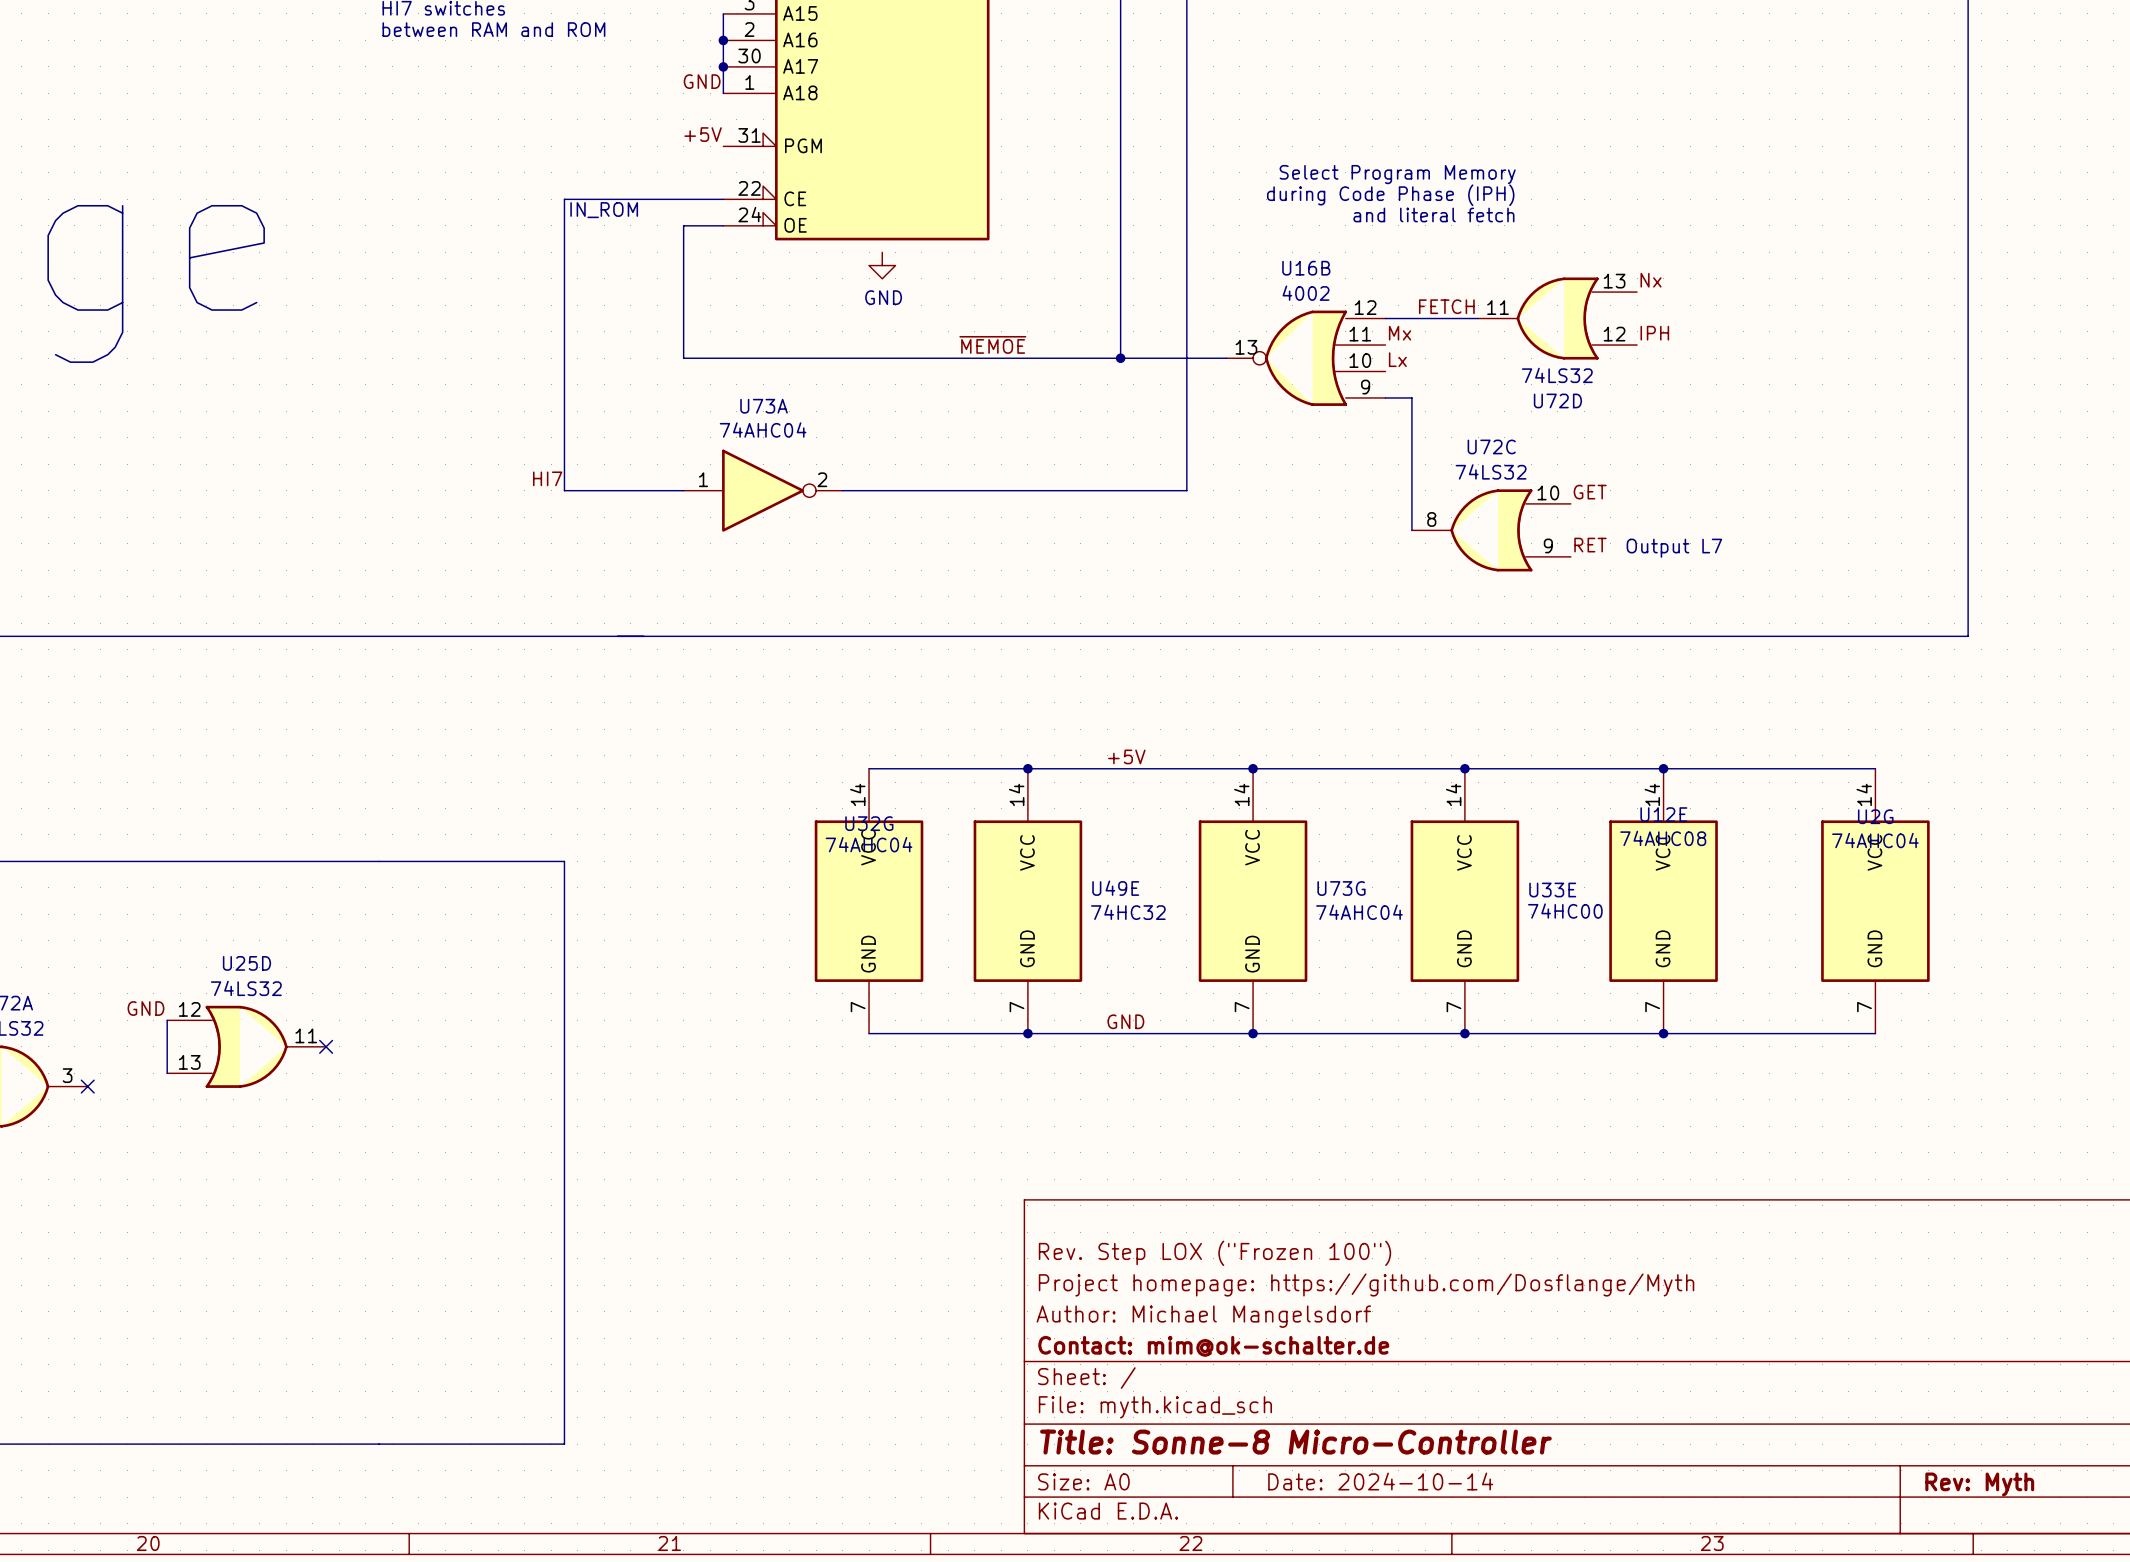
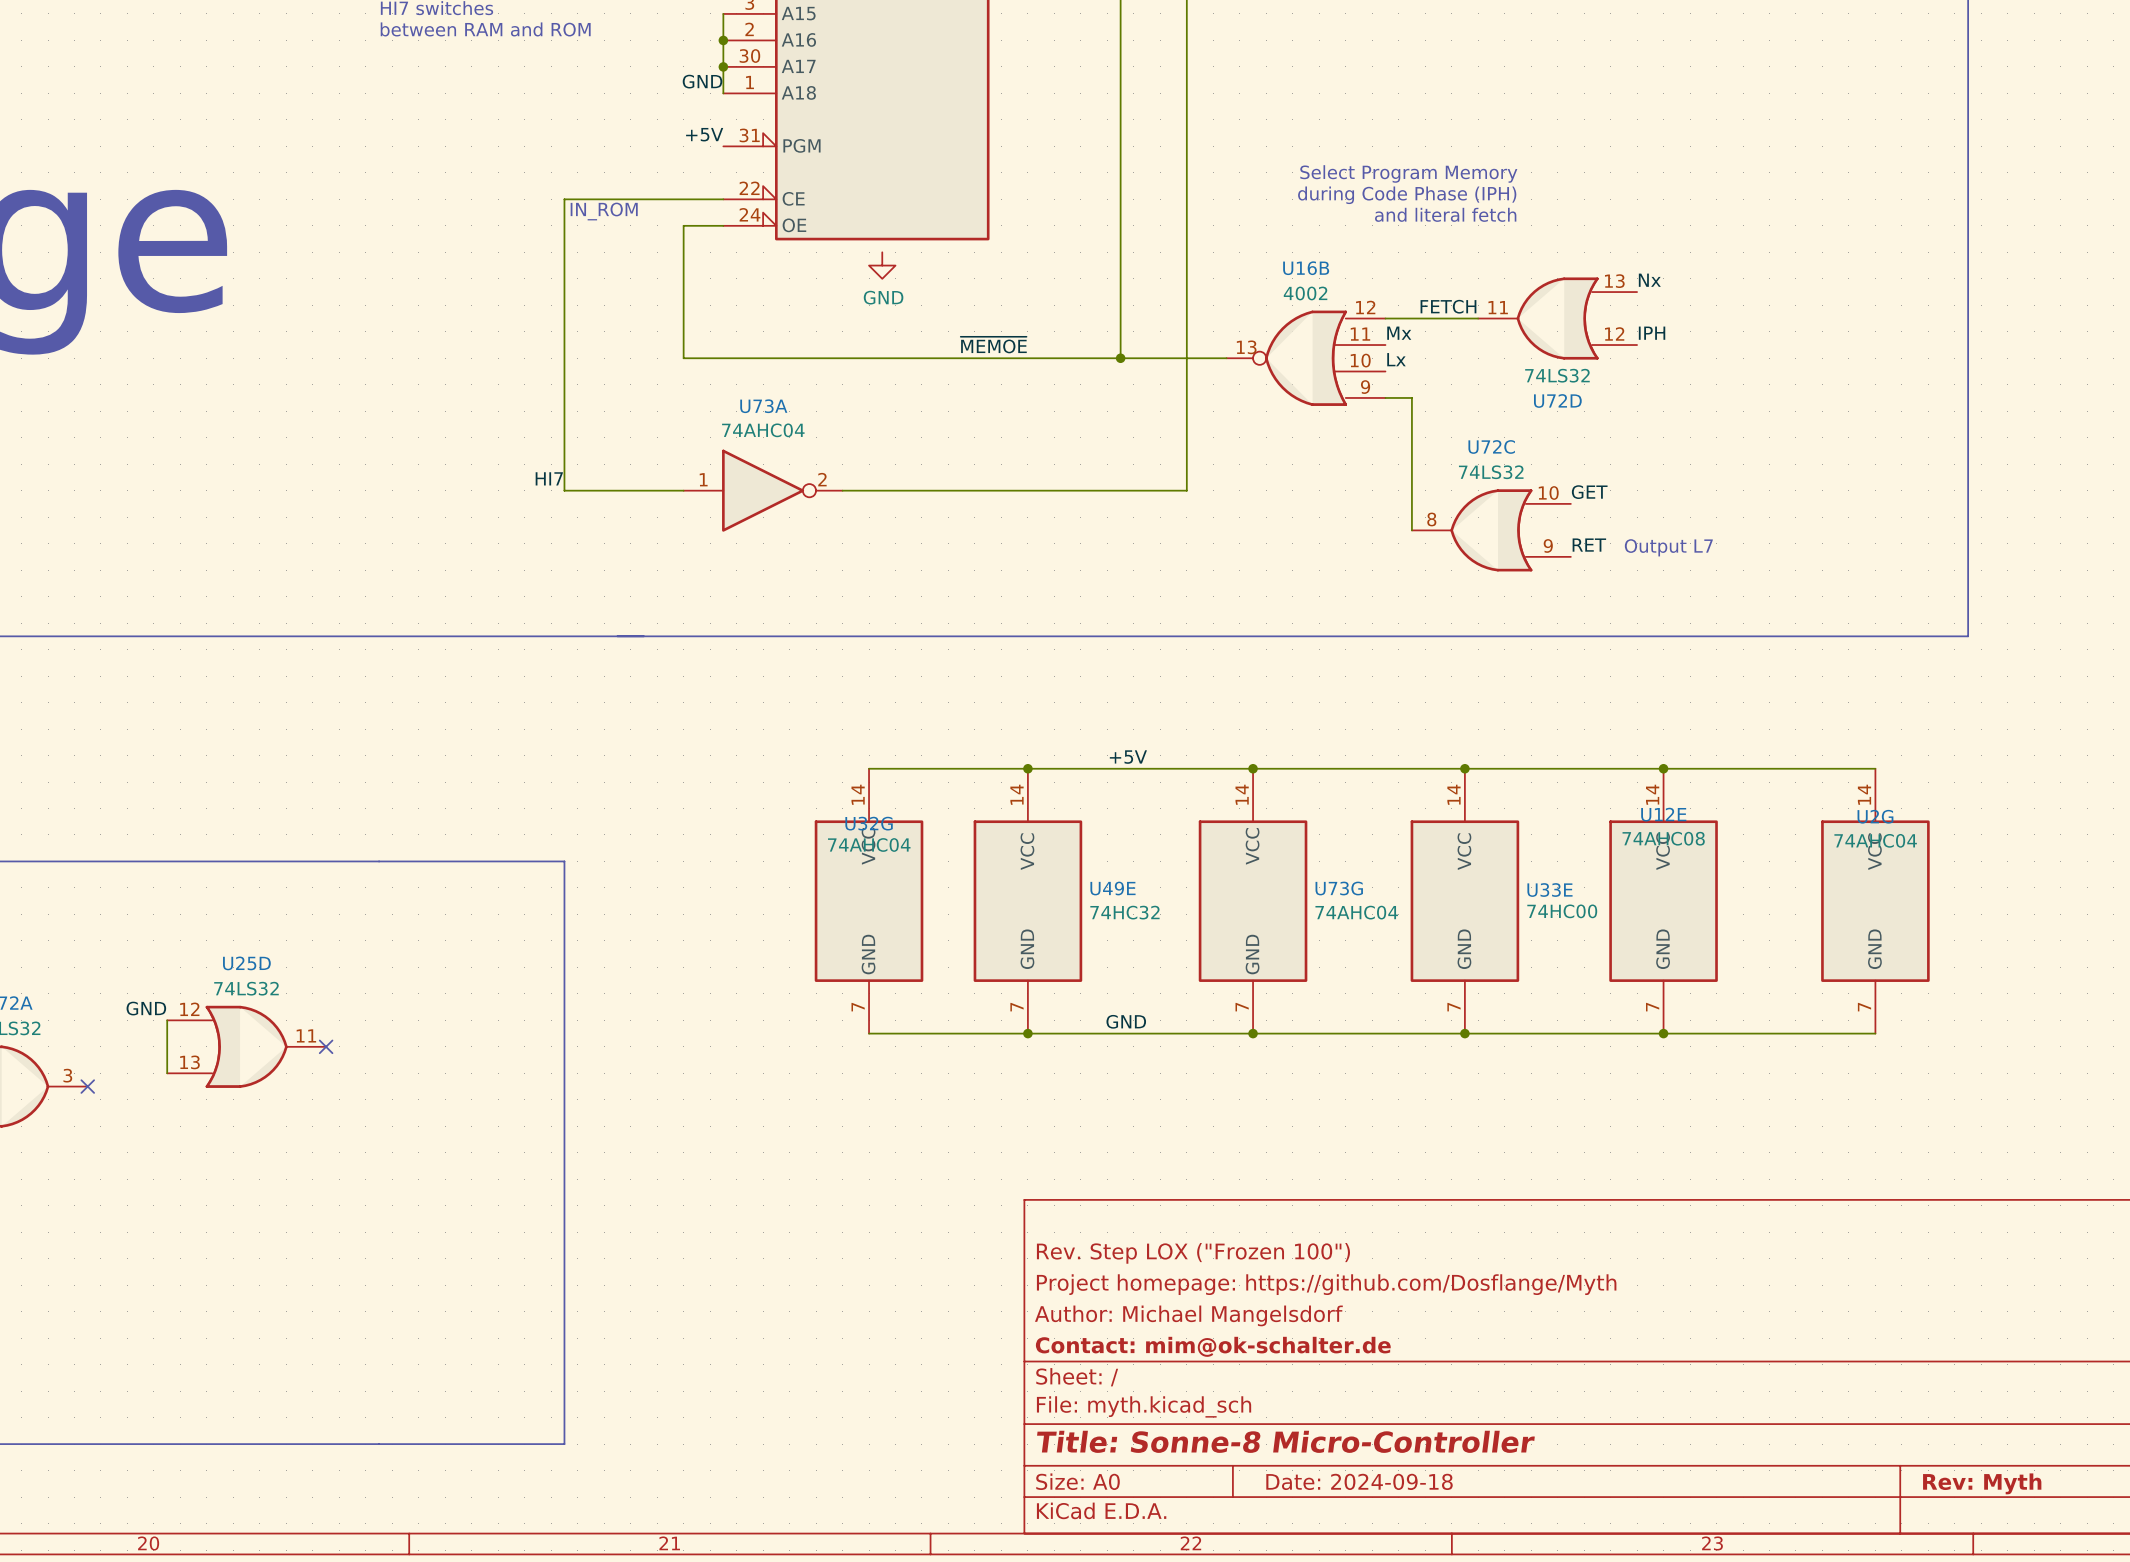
title block: Date: 2024-10-14 (1380, 1481) -> Date: 2024-09-18 (1359, 1481)

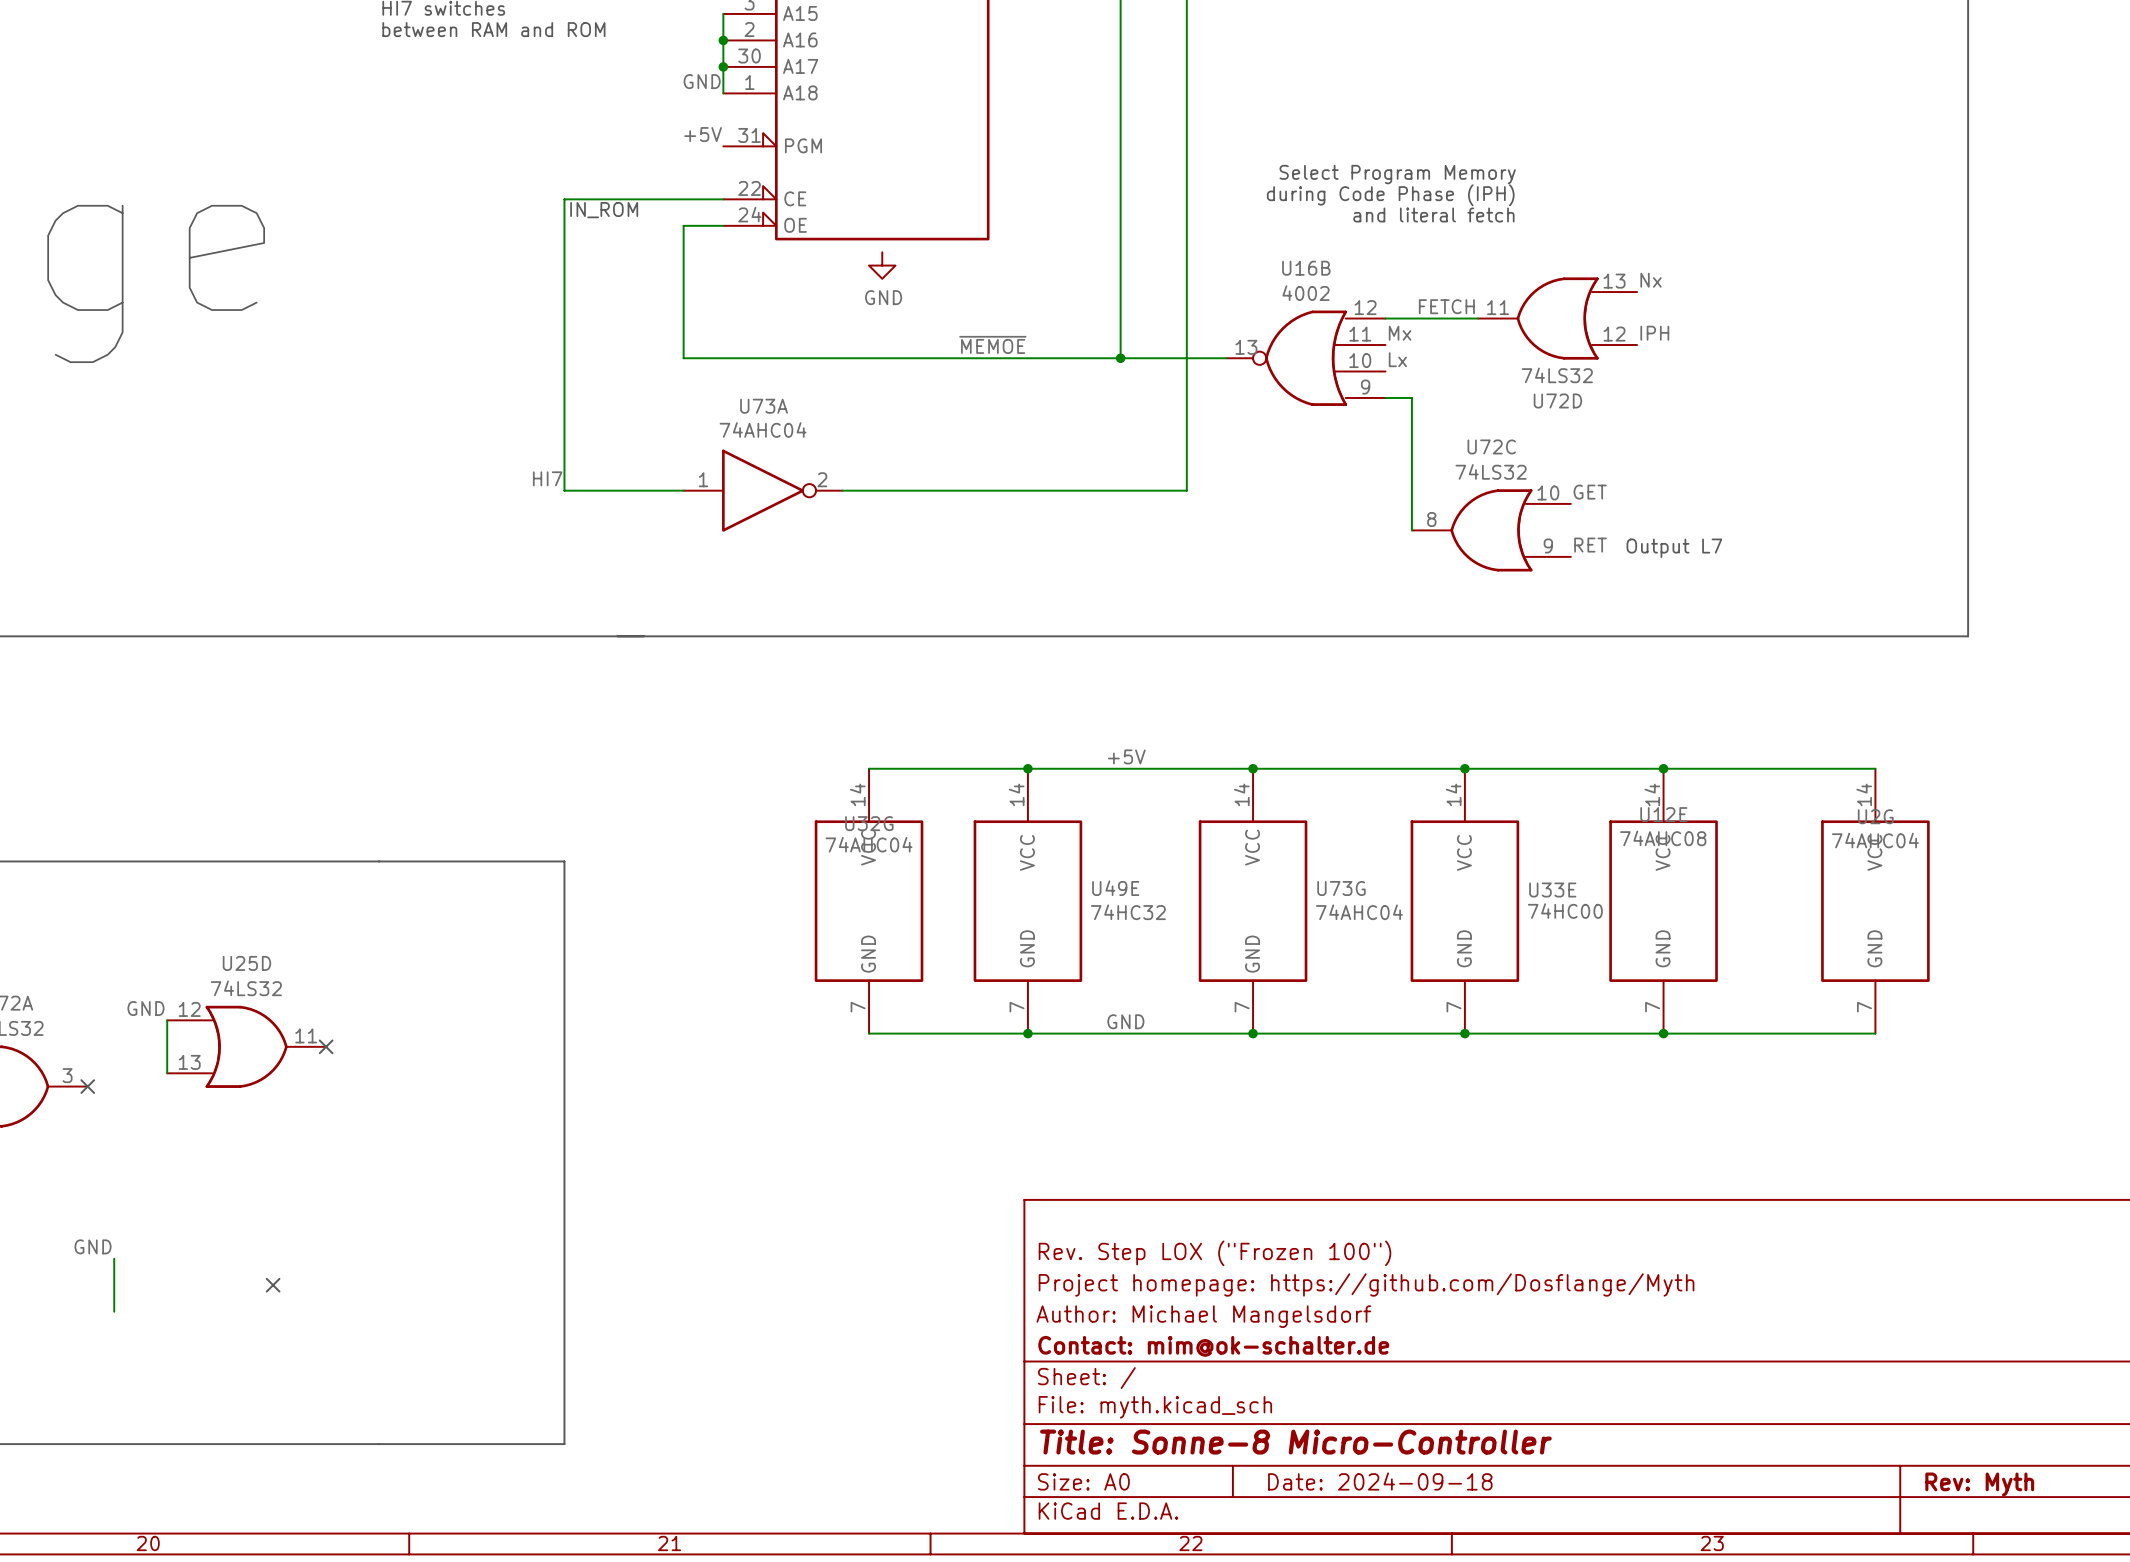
label: none -> GND (93, 1246)
wire: none -> (114, 1258) (114, 1311)
no-connect mark: none -> (273, 1285)

